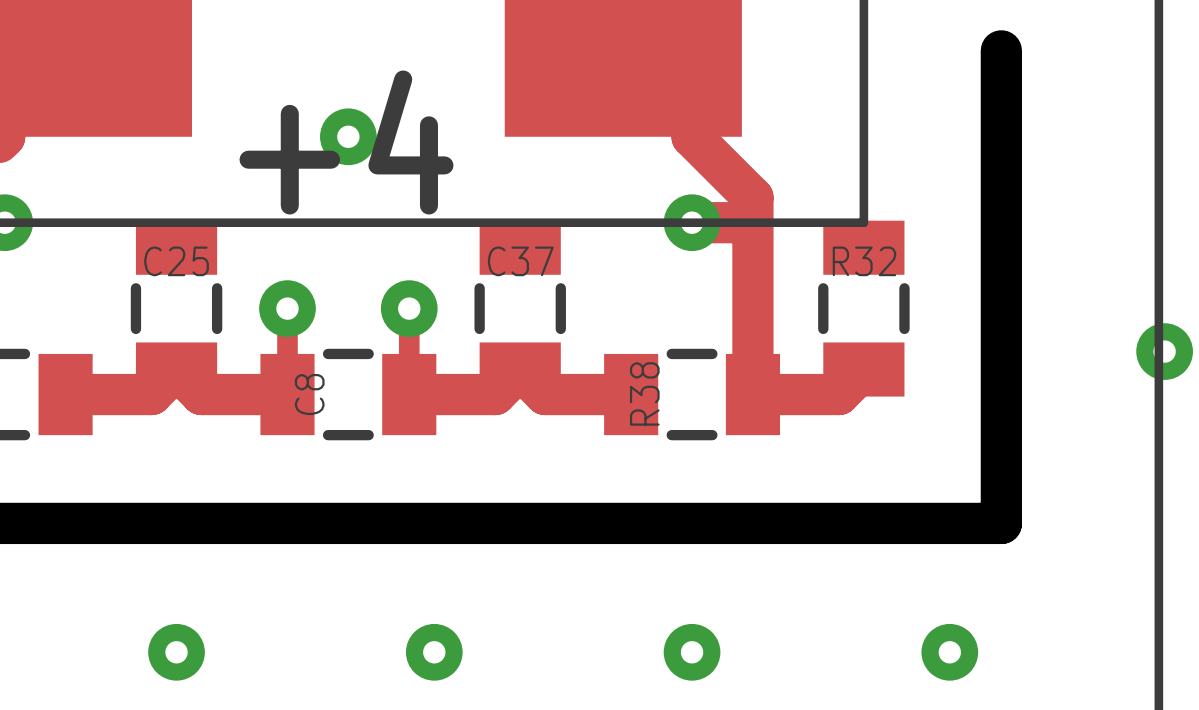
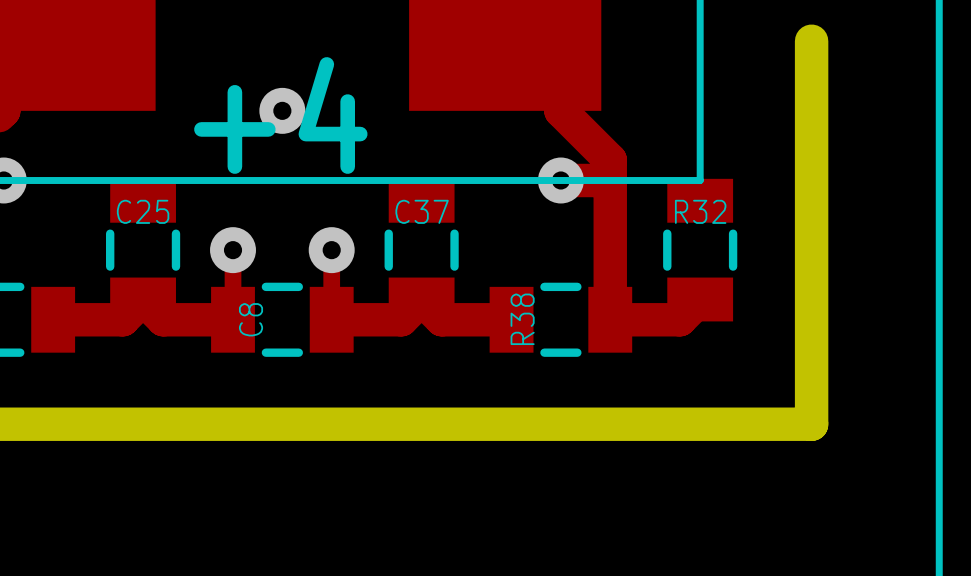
via: (1164, 351) -> none
via: (176, 652) -> none
via: (434, 652) -> none
via: (692, 652) -> none
via: (949, 652) -> none

